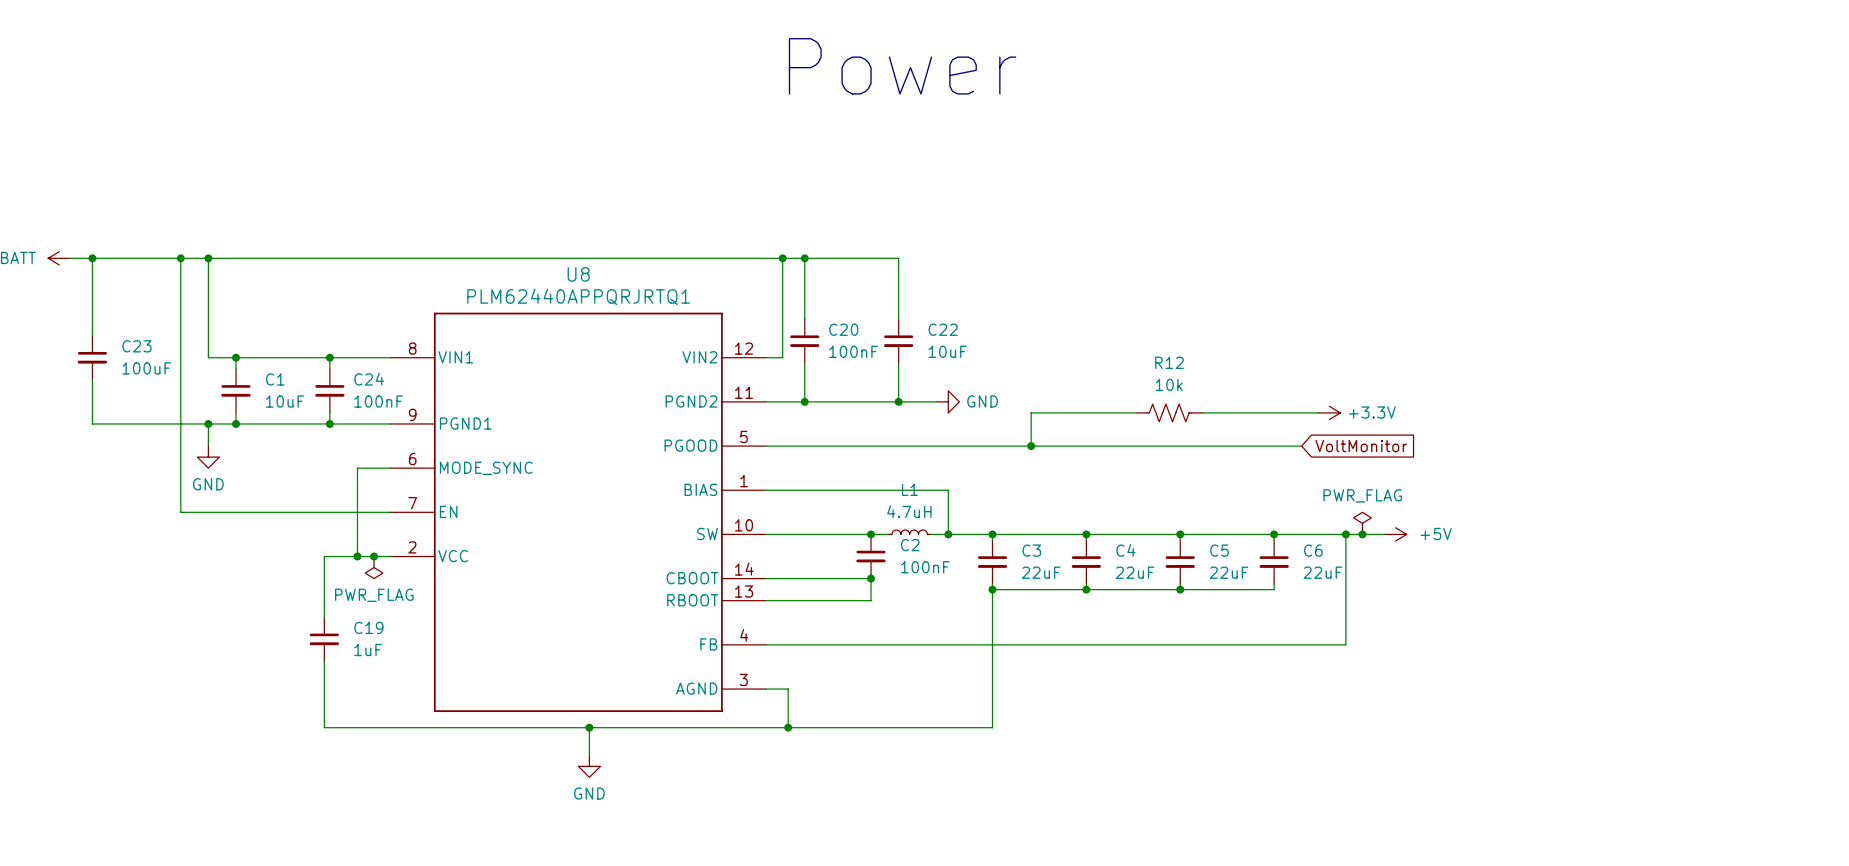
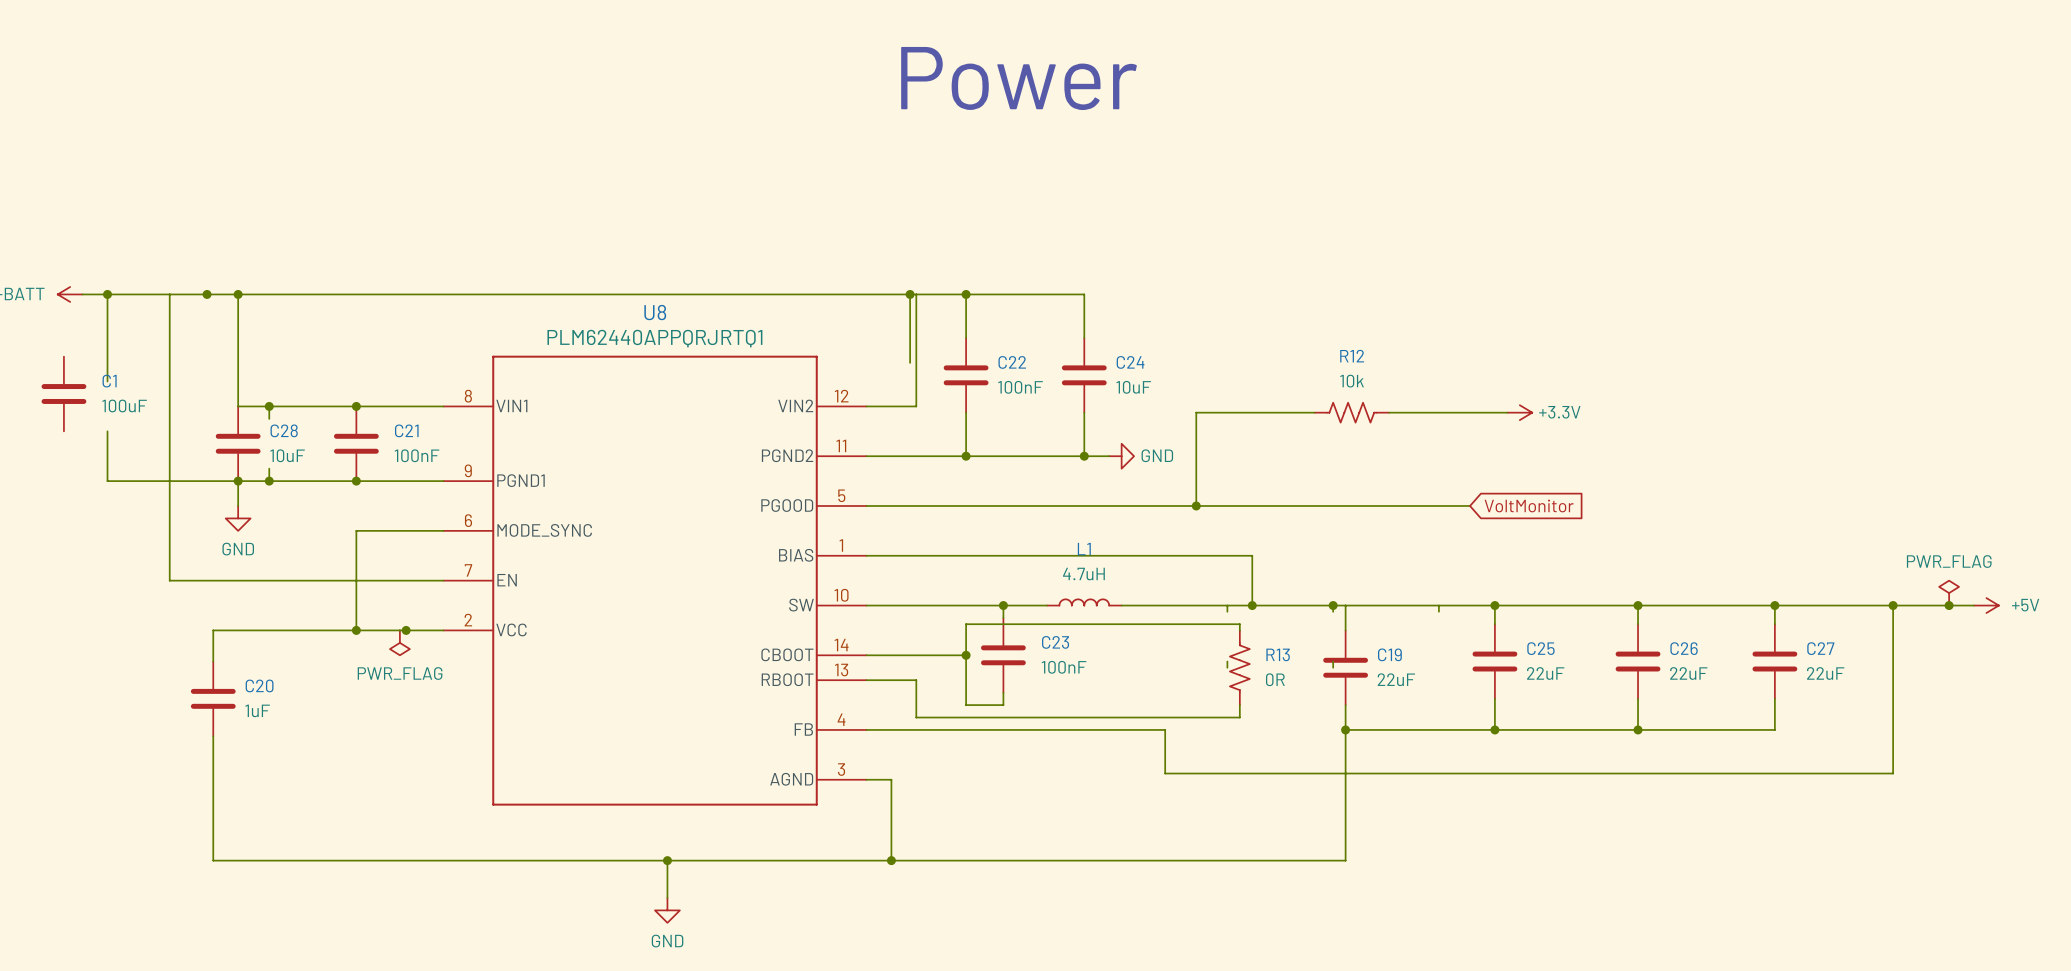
wire: (180, 258) (180, 512) -> (169, 294) (169, 580) (207, 580)
wire: (782, 258) (782, 357) -> (916, 294) (916, 406) (885, 406)
junction: (782, 258) -> none
junction: none -> (966, 294)
wire: (898, 258) (898, 319) -> (1015, 294) (1084, 294) (1084, 338)
C20 symbol: [790, 319, 820, 364] -> [190, 661, 236, 737]
C22 symbol: [883, 319, 914, 364] -> [943, 338, 989, 413]
C23 symbol: [77, 335, 108, 380] -> [981, 617, 1026, 693]
C20 value: 100nF (853, 351) -> 1uF (257, 710)
C22 value: 10uF (947, 351) -> 100nF (1020, 387)
wire: (329, 357) (329, 368) -> none
junction position: (329, 357) -> (356, 406)
wire: (804, 363) (804, 401) -> (966, 294) (966, 338)
wire: (898, 363) (898, 401) -> (966, 412) (966, 456)
wire: none -> (1084, 412) (1084, 456)
wire: none -> (1314, 412) (1196, 412) (1196, 505)
wire: none -> (1389, 412) (1507, 412)
C23 value: 100uF (146, 368) -> 100nF (1064, 667)
C1 symbol: [221, 368, 251, 413] -> [41, 356, 87, 432]
C24 symbol: [315, 368, 345, 413] -> [1061, 338, 1107, 413]
C28: none -> 10uF (238, 443)
C21: none -> 100nF (356, 443)
C1 value: 10uF (284, 401) -> 100uF (124, 405)
C24 value: 100nF (378, 401) -> 10uF (1133, 387)
junction: (804, 401) -> none
junction: none -> (966, 456)
junction: (898, 401) -> none
wire: none -> (1059, 456) (1109, 456)
power symbol position: GND (948, 401) -> GND (1121, 456)
junction: none -> (1084, 456)
wire: (329, 412) (329, 423) -> none
wire: (1136, 412) (1031, 412) (1031, 446) -> none
R12 position: (1169, 412) -> (1351, 412)
wire: (1202, 412) (1318, 412) -> none
power symbol position: +3.3V (1329, 412) -> +3.3V (1519, 412)
junction position: (329, 423) -> (356, 481)
junction position: (1031, 446) -> (1196, 505)
wire: (357, 468) (357, 556) -> (406, 530) (356, 530) (356, 630)
wire: (948, 490) (948, 534) -> (1071, 555) (1252, 555) (1252, 605)
power symbol: PWR_FLAG (1362, 523) -> none
power symbol: none -> PWR_FLAG (1949, 593)
L1 symbol: [887, 530, 932, 535] -> [1046, 599, 1122, 606]
junction position: (871, 534) -> (1003, 605)
wire: none -> (1046, 605) (1003, 605) (1003, 617)
wire: (931, 534) (992, 534) (992, 539) -> none
junction: (948, 534) -> none
junction: (992, 534) -> none
junction position: (1086, 534) -> (1252, 605)
wire: none -> (1345, 605) (1345, 630)
junction: (1274, 534) -> none
wire: none -> (1494, 605) (1494, 624)
junction: none -> (1494, 605)
wire: (1345, 534) (1345, 644) -> (1774, 698) (1774, 729) (1519, 729)
junction: (1345, 534) -> none
junction: (1362, 534) -> none
wire: none -> (1563, 605) (1973, 605)
power symbol: +5V (1395, 534) -> none
wire: none -> (1638, 605) (1638, 624)
junction: none -> (1638, 605)
wire: none -> (1774, 605) (1774, 624)
junction: none -> (1774, 605)
junction: none -> (1893, 605)
junction: none -> (1949, 605)
power symbol: none -> +5V (1986, 605)
junction: none -> (356, 630)
wire: (324, 556) (324, 617) -> (368, 630) (213, 630) (213, 661)
junction: (374, 556) -> none
C2: 100nF (871, 556) -> none
wire: none -> (1239, 630) (1239, 624) (966, 624) (966, 705) (1003, 705) (1003, 692)
C3: 22uF (992, 562) -> none
C4: 22uF (1086, 562) -> none
C5: 22uF (1180, 562) -> none
C6: 22uF (1274, 562) -> none
power symbol position: PWR_FLAG (374, 567) -> PWR_FLAG (399, 642)
wire: (854, 578) (871, 578) (871, 600) (810, 600) -> (1239, 705) (1239, 717) (916, 717) (916, 680)
junction position: (871, 578) -> (966, 655)
wire: (992, 584) (992, 727) (324, 727) (324, 661) -> none
wire: (1274, 584) (1274, 589) (992, 589) -> none
C25: none -> 22uF (1494, 661)
C26: none -> 22uF (1638, 661)
C27: none -> 22uF (1774, 661)
junction: (992, 589) -> none
junction: (1086, 589) -> none
R13: none -> 0R (1239, 667)
junction: (1180, 589) -> none
C19 symbol: [309, 617, 340, 662] -> [1323, 630, 1369, 706]
wire: none -> (1494, 698) (1494, 729)
wire: none -> (1638, 698) (1638, 729)
wire: none -> (1345, 705) (1345, 860) (213, 860) (213, 736)
wire: (1031, 644) (1191, 644) -> (1165, 729) (1165, 773) (1893, 773) (1893, 605)
junction: none -> (1345, 729)
junction: none -> (1494, 729)
junction: none -> (1638, 729)
C19 value: 1uF (368, 650) -> 22uF (1396, 679)
wire: (589, 727) (589, 755) -> none
junction position: (589, 727) -> (667, 860)
wire: none -> (891, 823) (891, 860)
junction position: (788, 727) -> (891, 860)
wire: none -> (667, 860) (667, 897)
power symbol position: GND (589, 766) -> GND (667, 910)

